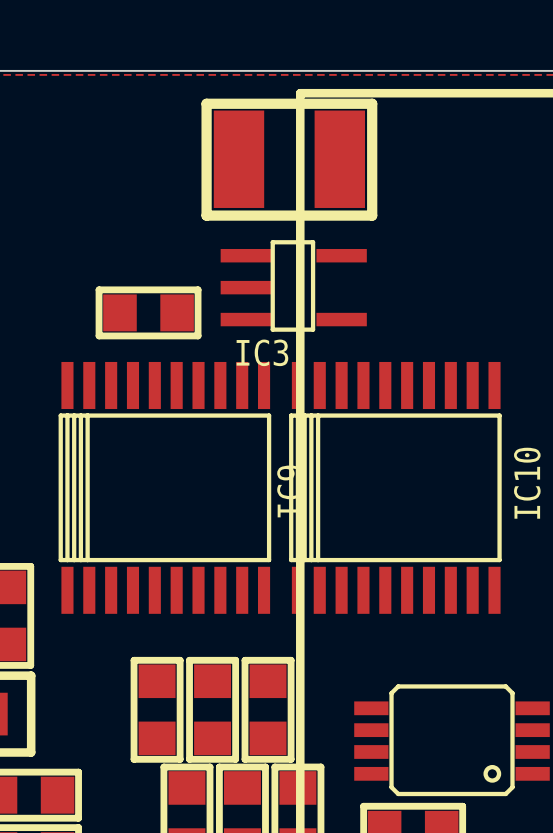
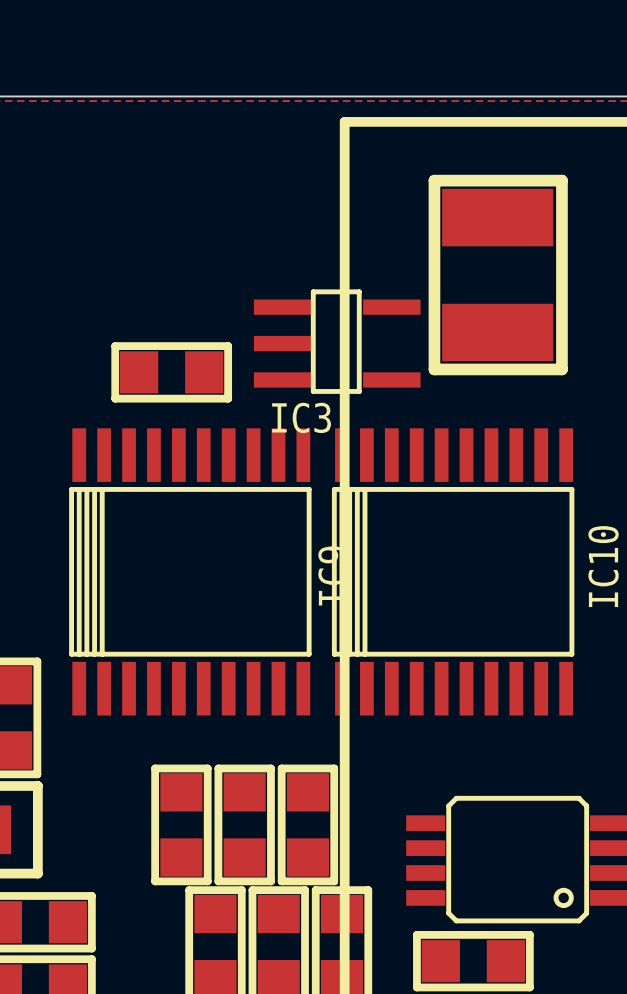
part rotation: 0° (289, 159) -> 90° clockwise (498, 275)
part position: (289, 159) -> (498, 275)

